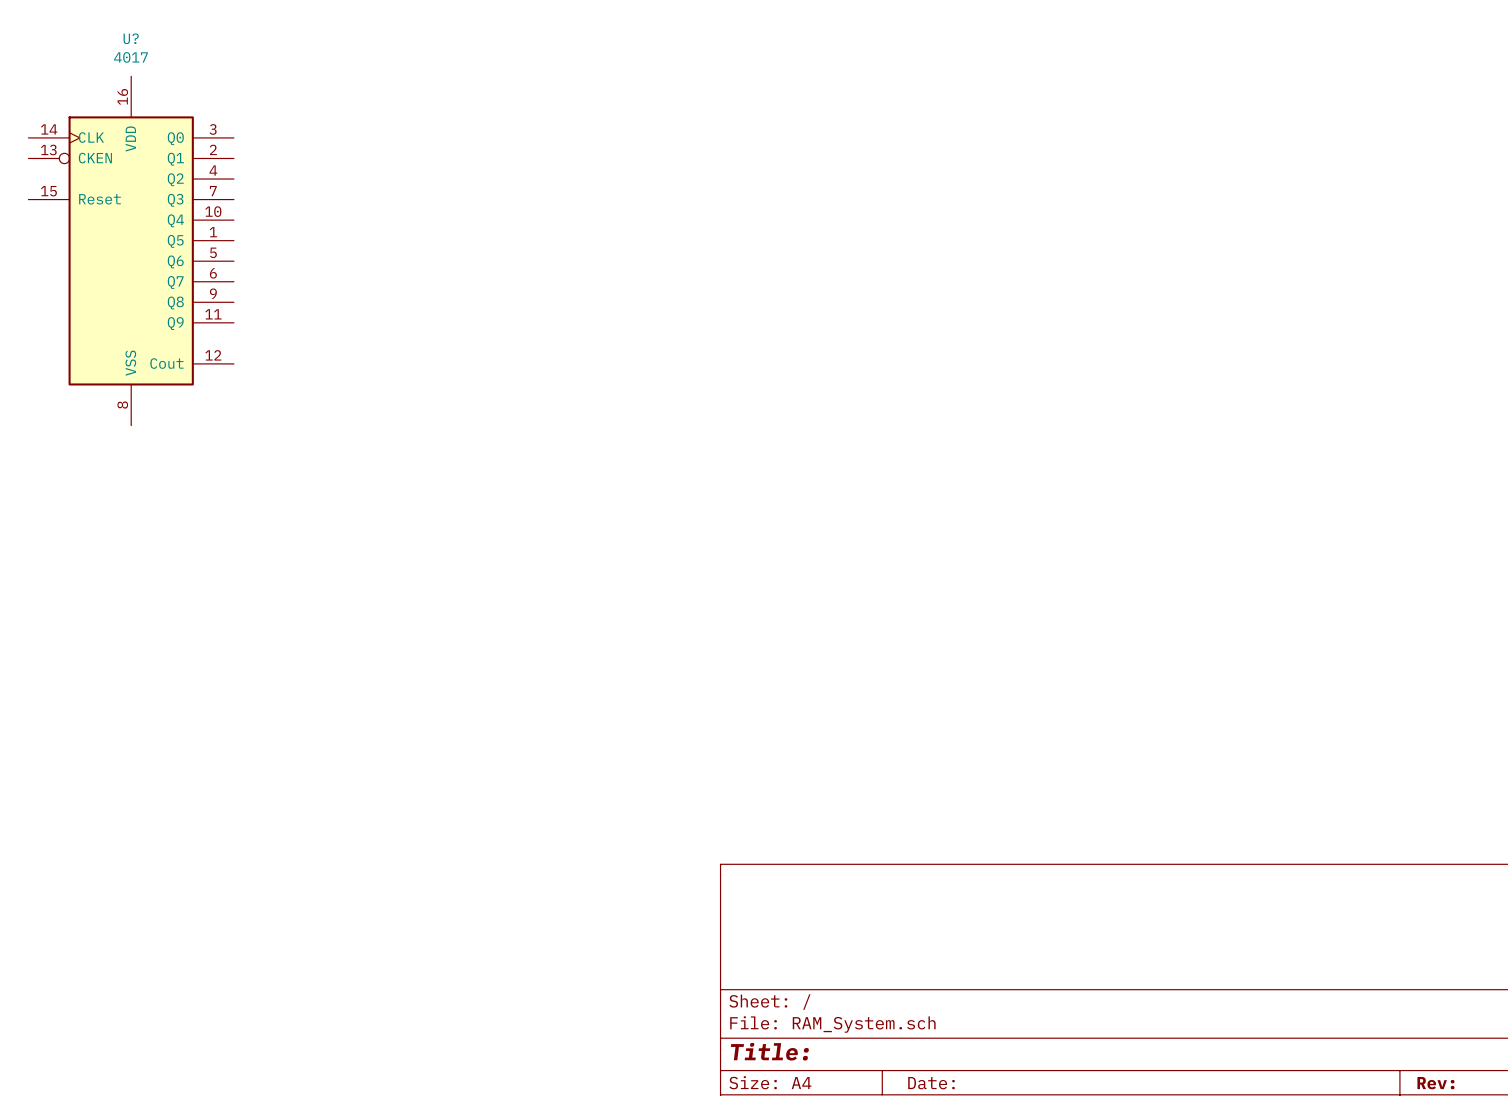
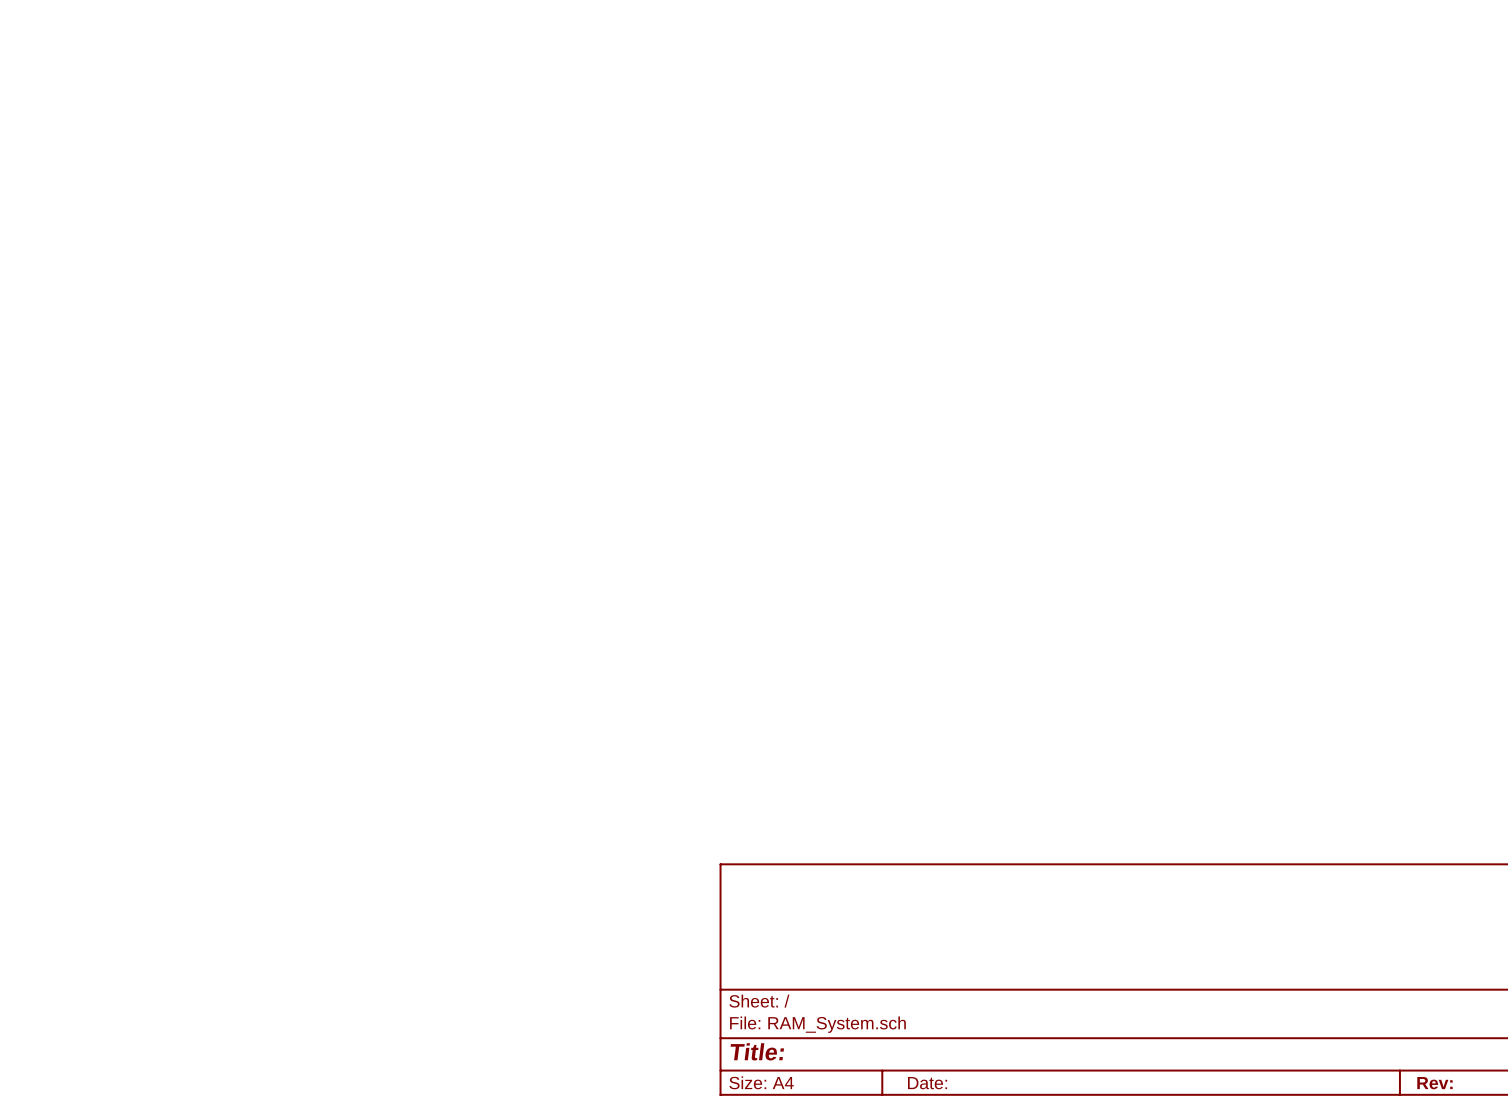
U?: 4017 (131, 250) -> none

